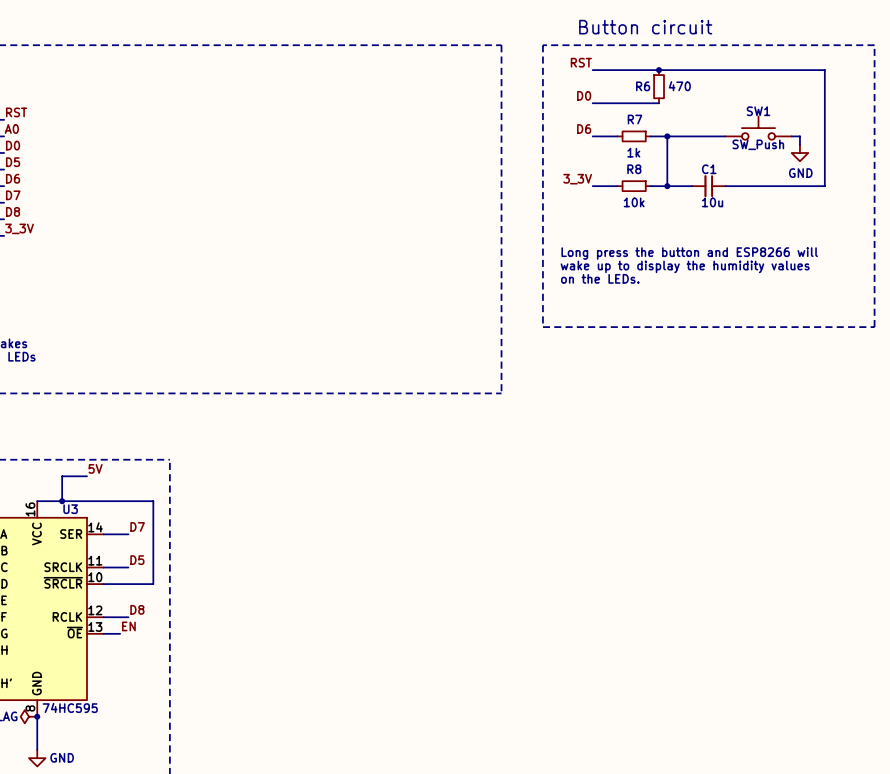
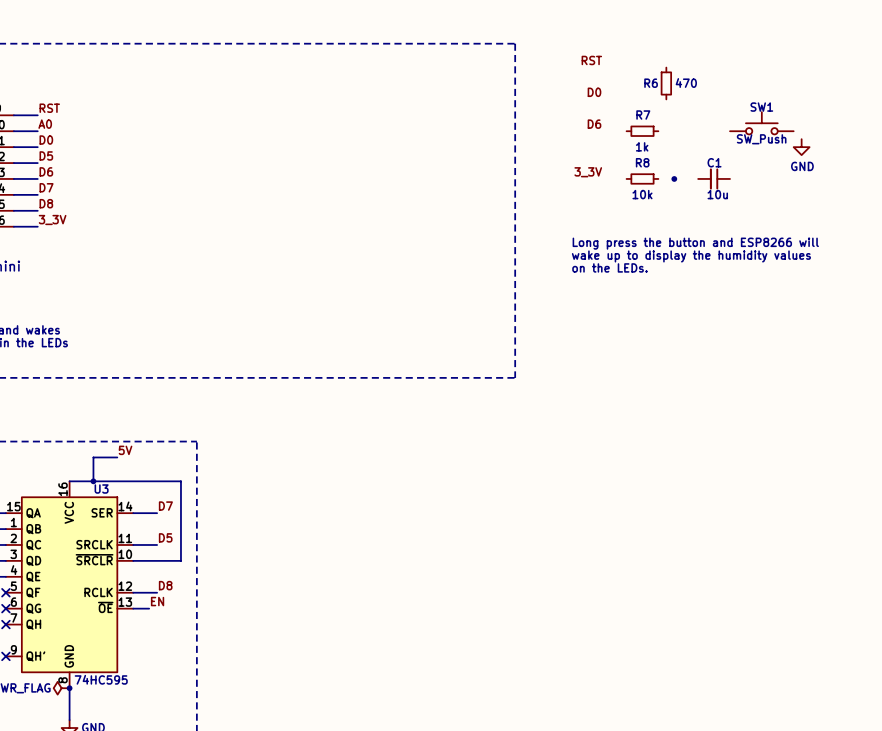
text: Button circuit (645, 27) -> none
line: (542, 45) (874, 45) (874, 327) (542, 327) (542, 45) -> none
wire: (592, 70) (824, 70) (824, 186) (725, 186) -> none
junction: (659, 70) -> none
wire: (592, 103) (659, 103) -> none
wire: (592, 136) (617, 136) -> none
wire: (650, 136) (725, 136) -> none
wire: (667, 136) (667, 186) -> none
junction: (667, 136) -> none
wire: (791, 136) (799, 136) (799, 144) -> none
wire: (592, 186) (617, 186) -> none
wire: (650, 186) (692, 186) -> none

